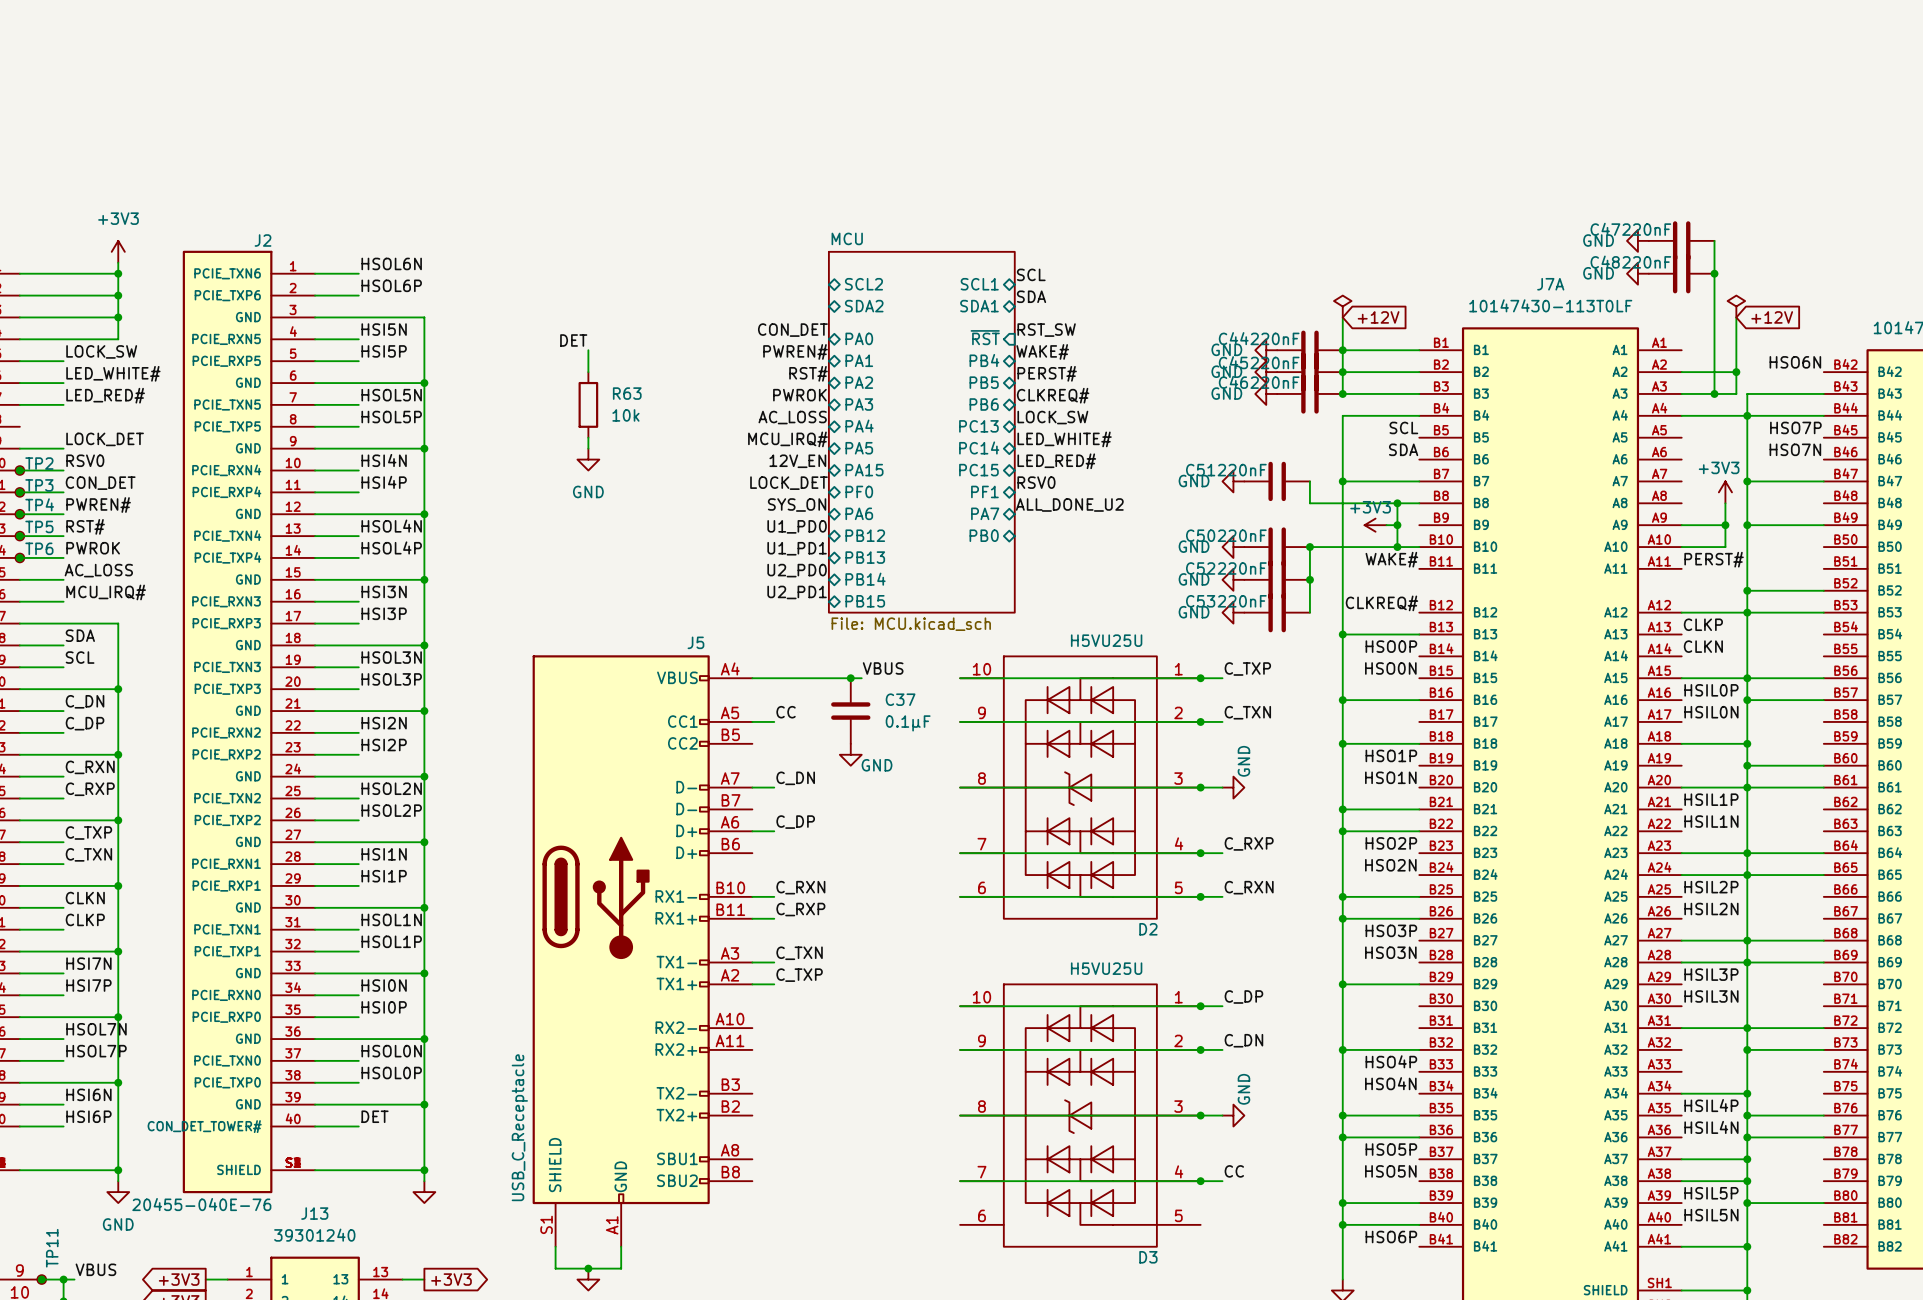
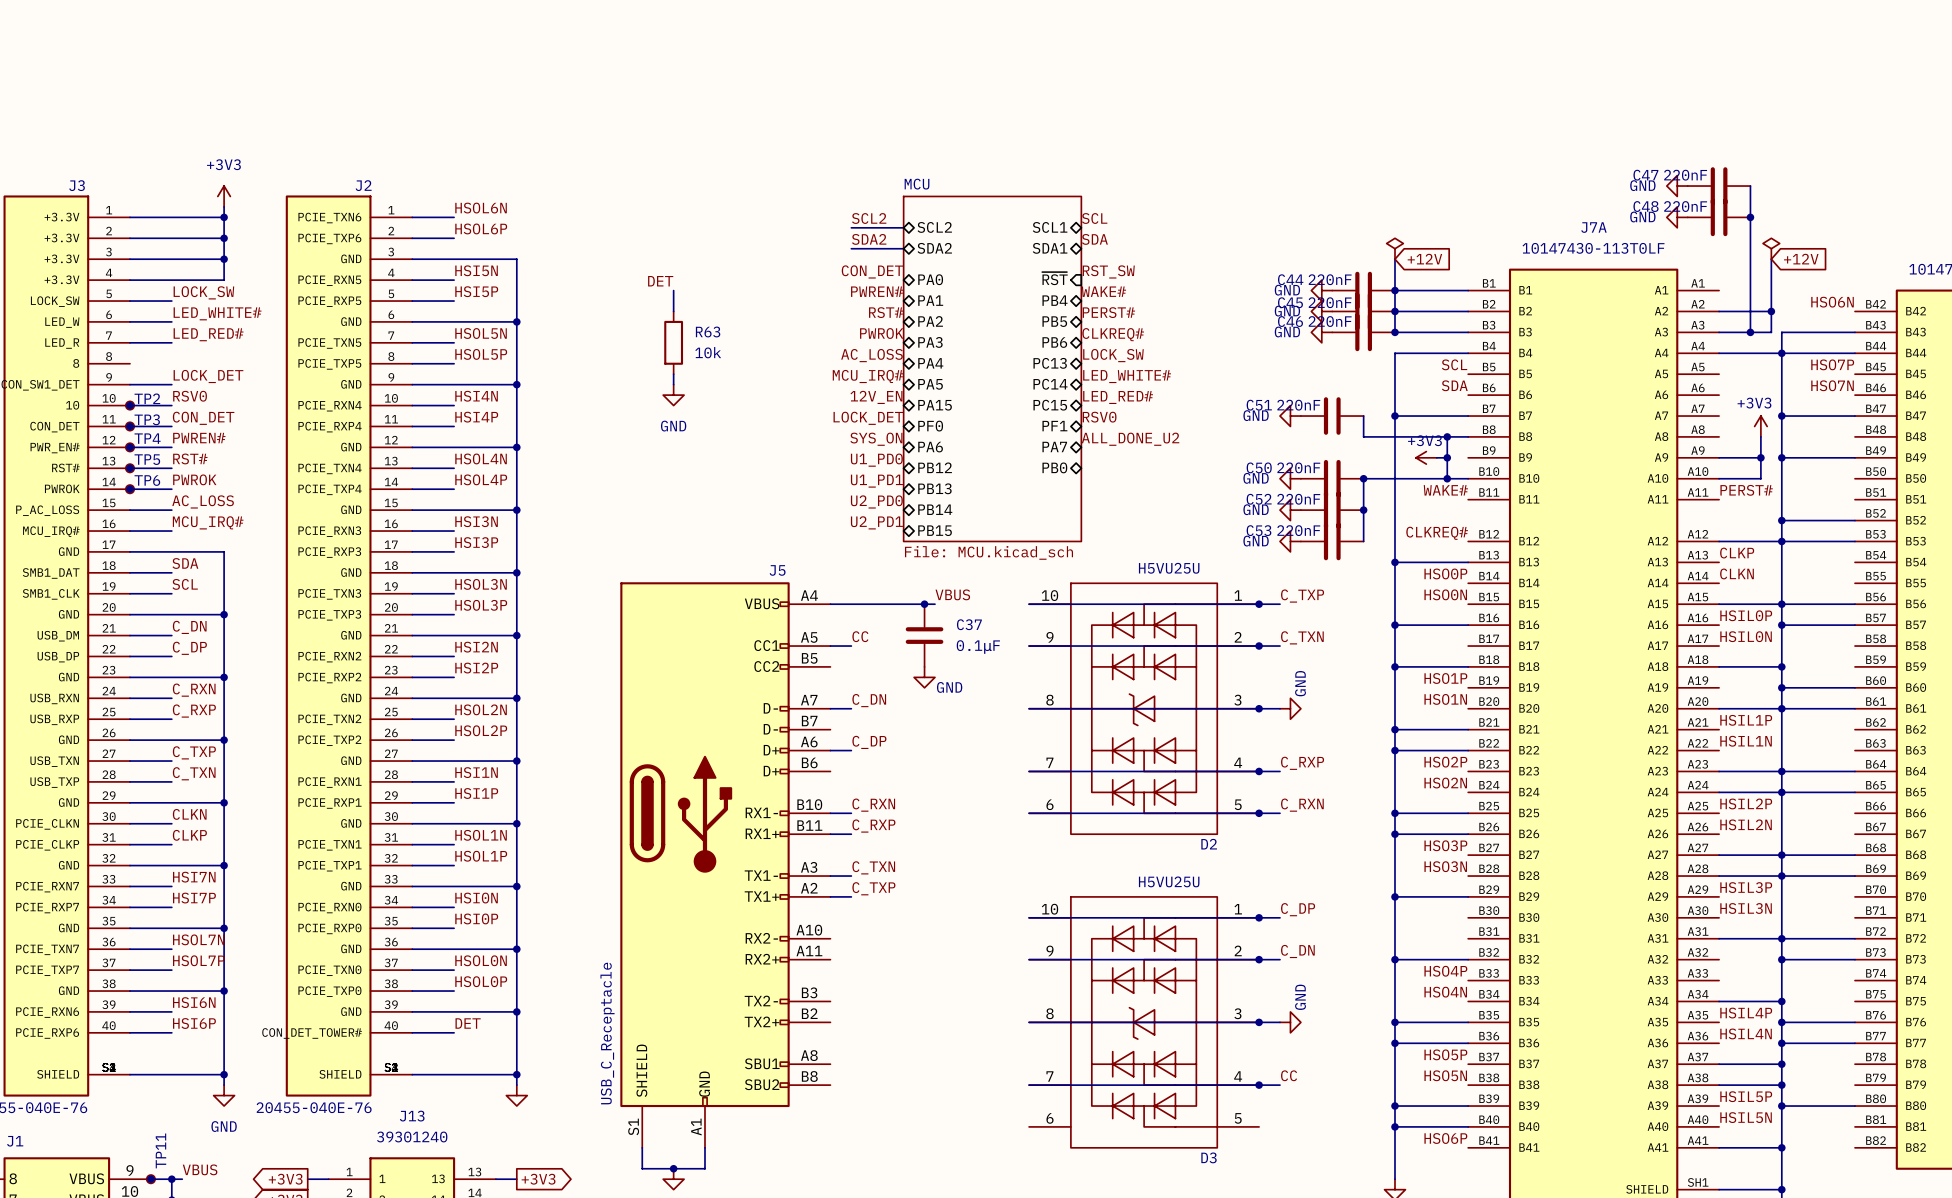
label: none -> SCL2 (869, 218)
wire: none -> (851, 227) (903, 227)
label: none -> SDA2 (869, 239)
wire: none -> (851, 248) (903, 248)

